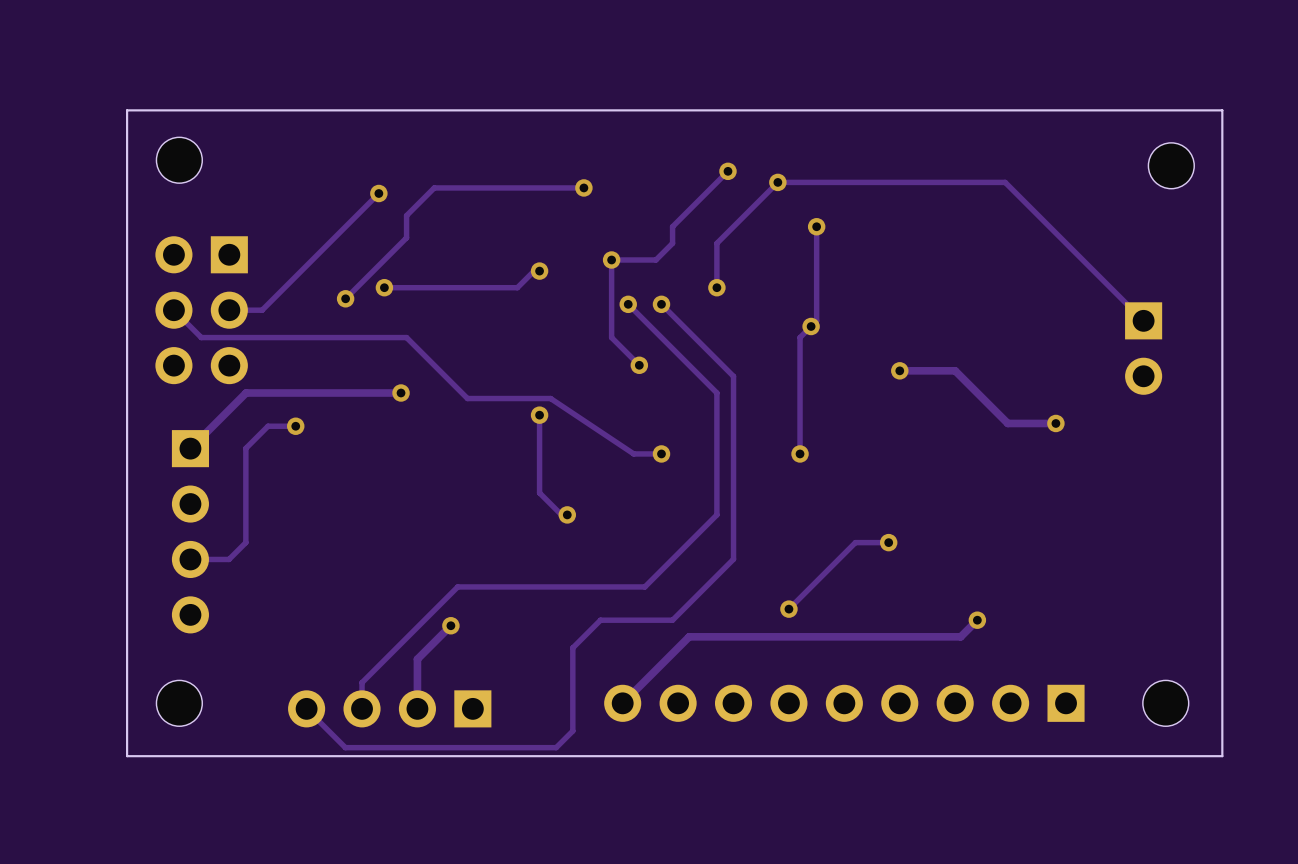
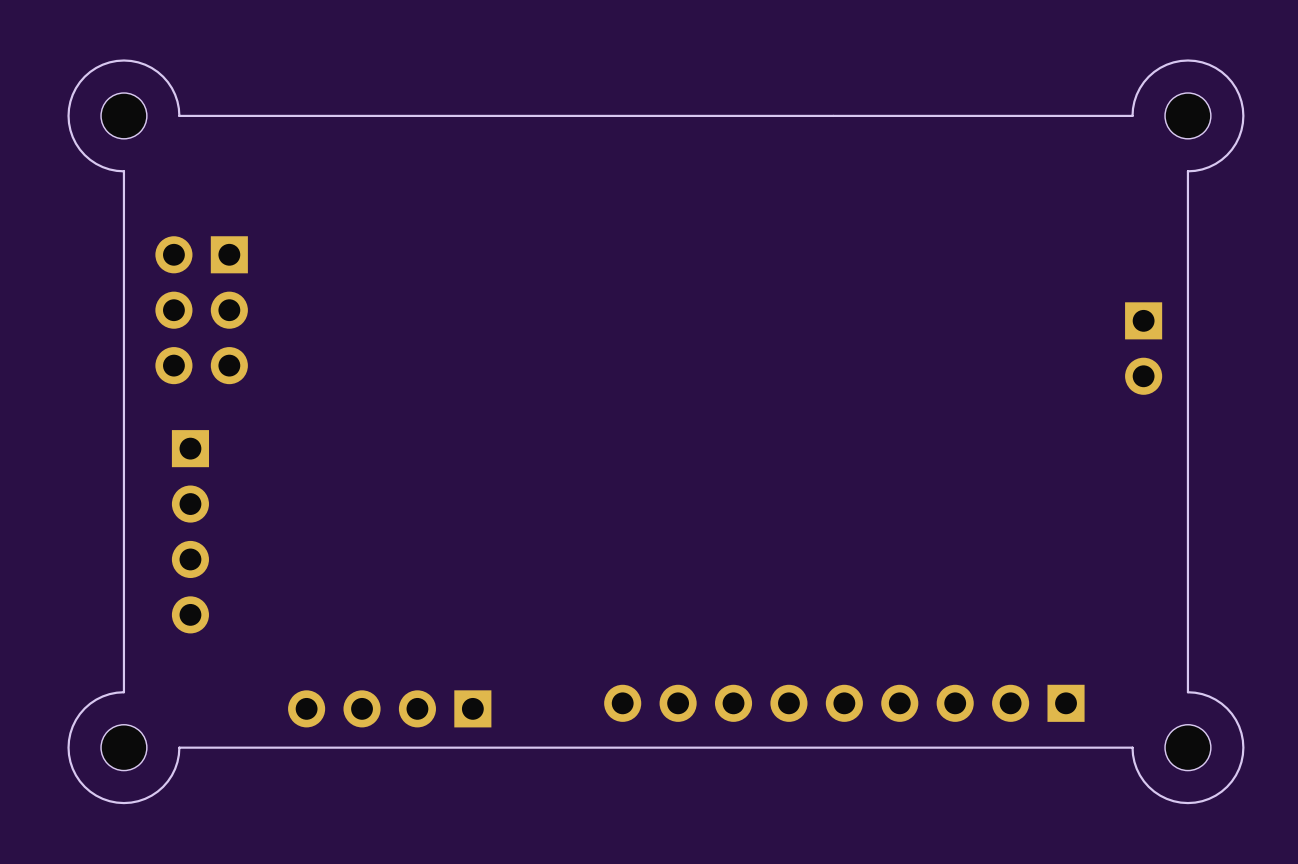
board edge: (1222, 110) (127, 110) (127, 756) (1222, 756) (1222, 110) -> (1132, 115) (1136, 94) (1148, 76) (1166, 64) (1180, 60) (1202, 62) (1221, 71) (1235, 88) (1242, 108) (1242, 123) (1239, 137) (1227, 155) (1209, 167) (1187, 171) (1187, 692) (1209, 696) (1227, 708) (1239, 726) (1243, 747) (1241, 762) (1235, 775) (1227, 786) (1215, 795) (1202, 801) (1187, 803) (1173, 801) (1160, 795) (1148, 786) (1139, 775) (1134, 762) (1132, 747) (179, 747) (175, 768) (163, 786) (145, 798) (123, 803) (109, 801) (96, 795) (84, 786) (75, 775) (70, 762) (68, 747) (70, 733) (75, 719) (84, 708) (96, 699) (109, 694) (123, 692) (123, 171) (102, 167) (84, 155) (72, 137) (68, 115) (70, 101) (75, 88) (84, 76) (96, 67) (109, 62) (123, 60) (138, 62) (151, 67) (163, 76) (171, 88) (177, 101) (179, 115) (1132, 115)
part position: (179, 160) -> (123, 115)
part position: (1171, 165) -> (1187, 115)
track: (727, 171) (672, 226) (672, 243) (655, 259) (611, 259) (611, 337) (639, 365) -> none
via: (727, 171) -> none
via: (777, 182) -> none
track: (583, 187) (434, 187) (406, 215) (406, 237) (345, 298) -> none
via: (583, 187) -> none
track: (378, 193) (262, 310) (229, 310) -> none
via: (378, 193) -> none
track: (816, 226) (816, 320) (800, 337) (800, 453) -> none
via: (816, 226) -> none
via: (611, 259) -> none
track: (539, 271) (534, 271) (517, 287) (384, 287) -> none
via: (539, 271) -> none
via: (384, 287) -> none
track: (716, 287) (716, 243) (777, 182) (1005, 182) (1143, 320) -> none
via: (716, 287) -> none
via: (345, 298) -> none
track: (628, 304) (716, 392) (716, 514) (644, 586) (457, 586) (362, 682) (362, 708) -> none
via: (628, 304) -> none
track: (661, 304) (733, 376) (733, 559) (672, 620) (600, 620) (572, 647) (572, 731) (556, 747) (345, 747) (306, 708) -> none
via: (661, 304) -> none
track: (173, 310) (201, 337) (406, 337) (467, 398) (550, 398) (633, 453) (661, 453) -> none
via: (811, 326) -> none
via: (639, 365) -> none
track: (899, 370) (955, 370) (1007, 423) (1055, 423) -> none
via: (899, 370) -> none
track: (401, 392) (246, 392) (190, 448) -> none
via: (401, 392) -> none
track: (539, 415) (539, 492) (561, 514) (567, 514) -> none
via: (539, 415) -> none
via: (1055, 423) -> none
track: (295, 426) (268, 426) (245, 448) (245, 542) (229, 559) (190, 559) -> none
via: (295, 426) -> none
via: (661, 453) -> none
via: (800, 453) -> none
via: (567, 514) -> none
track: (888, 542) (855, 542) (788, 609) -> none
via: (888, 542) -> none
via: (788, 609) -> none
track: (977, 620) (960, 636) (689, 636) (622, 703) -> none
via: (977, 620) -> none
track: (450, 625) (417, 659) (417, 708) -> none
via: (450, 625) -> none
part position: (179, 703) -> (123, 747)
part position: (1165, 703) -> (1187, 747)

